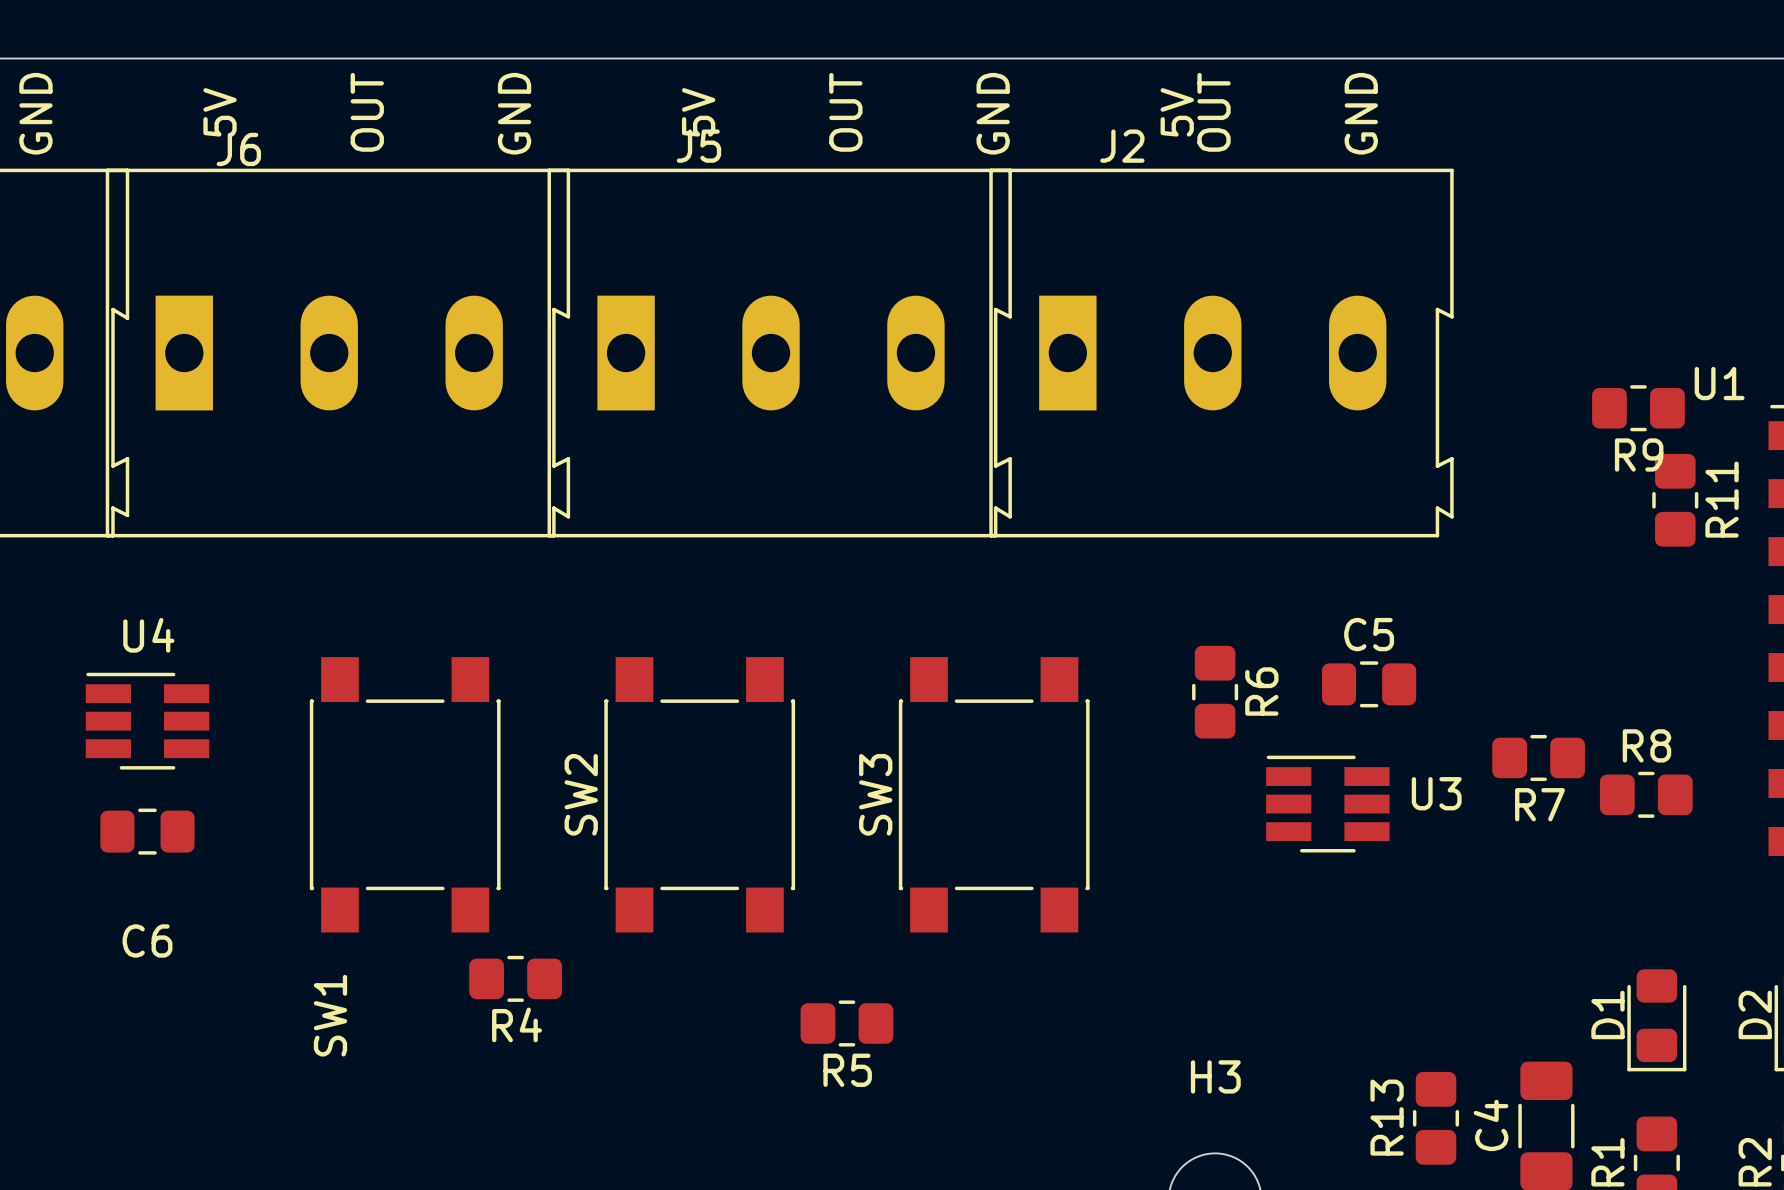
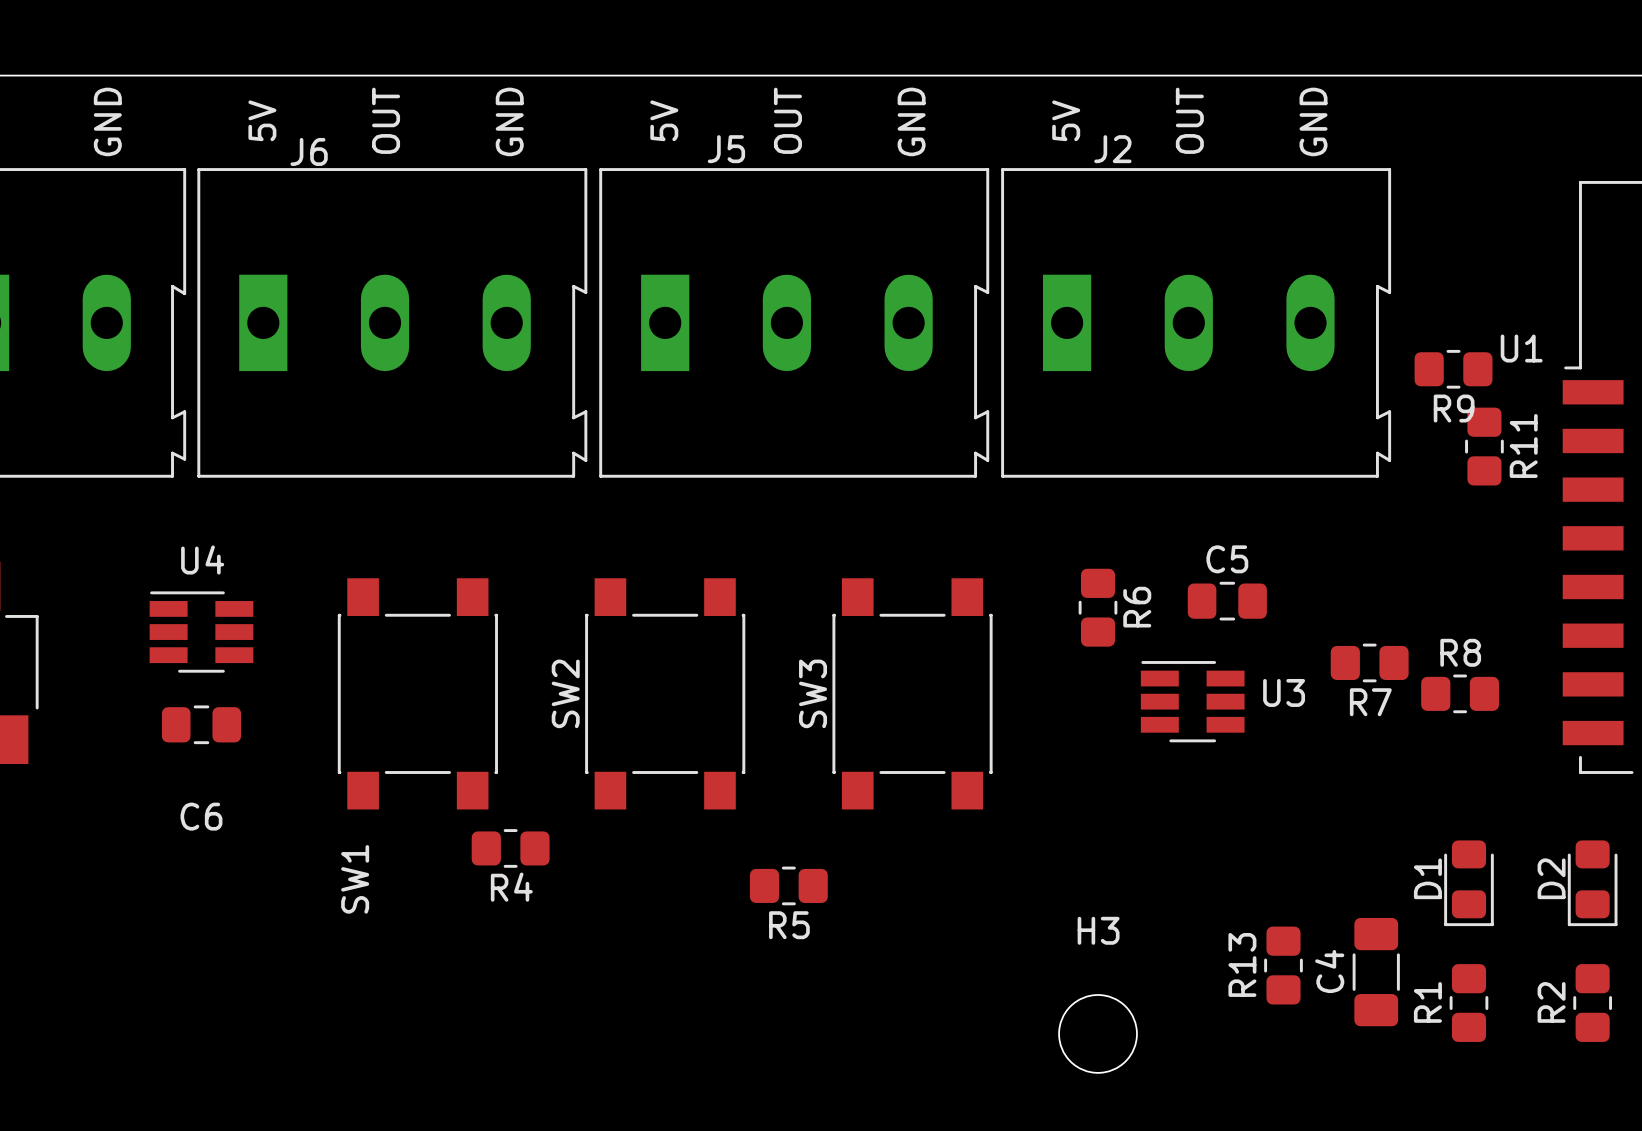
text position: OUT (1214, 112) -> OUT (1189, 120)
text position: GND (1361, 113) -> GND (1313, 121)
J6 position: (337, 353) -> (392, 322)
J5 position: (779, 353) -> (794, 322)
J2 position: (1221, 353) -> (1196, 322)

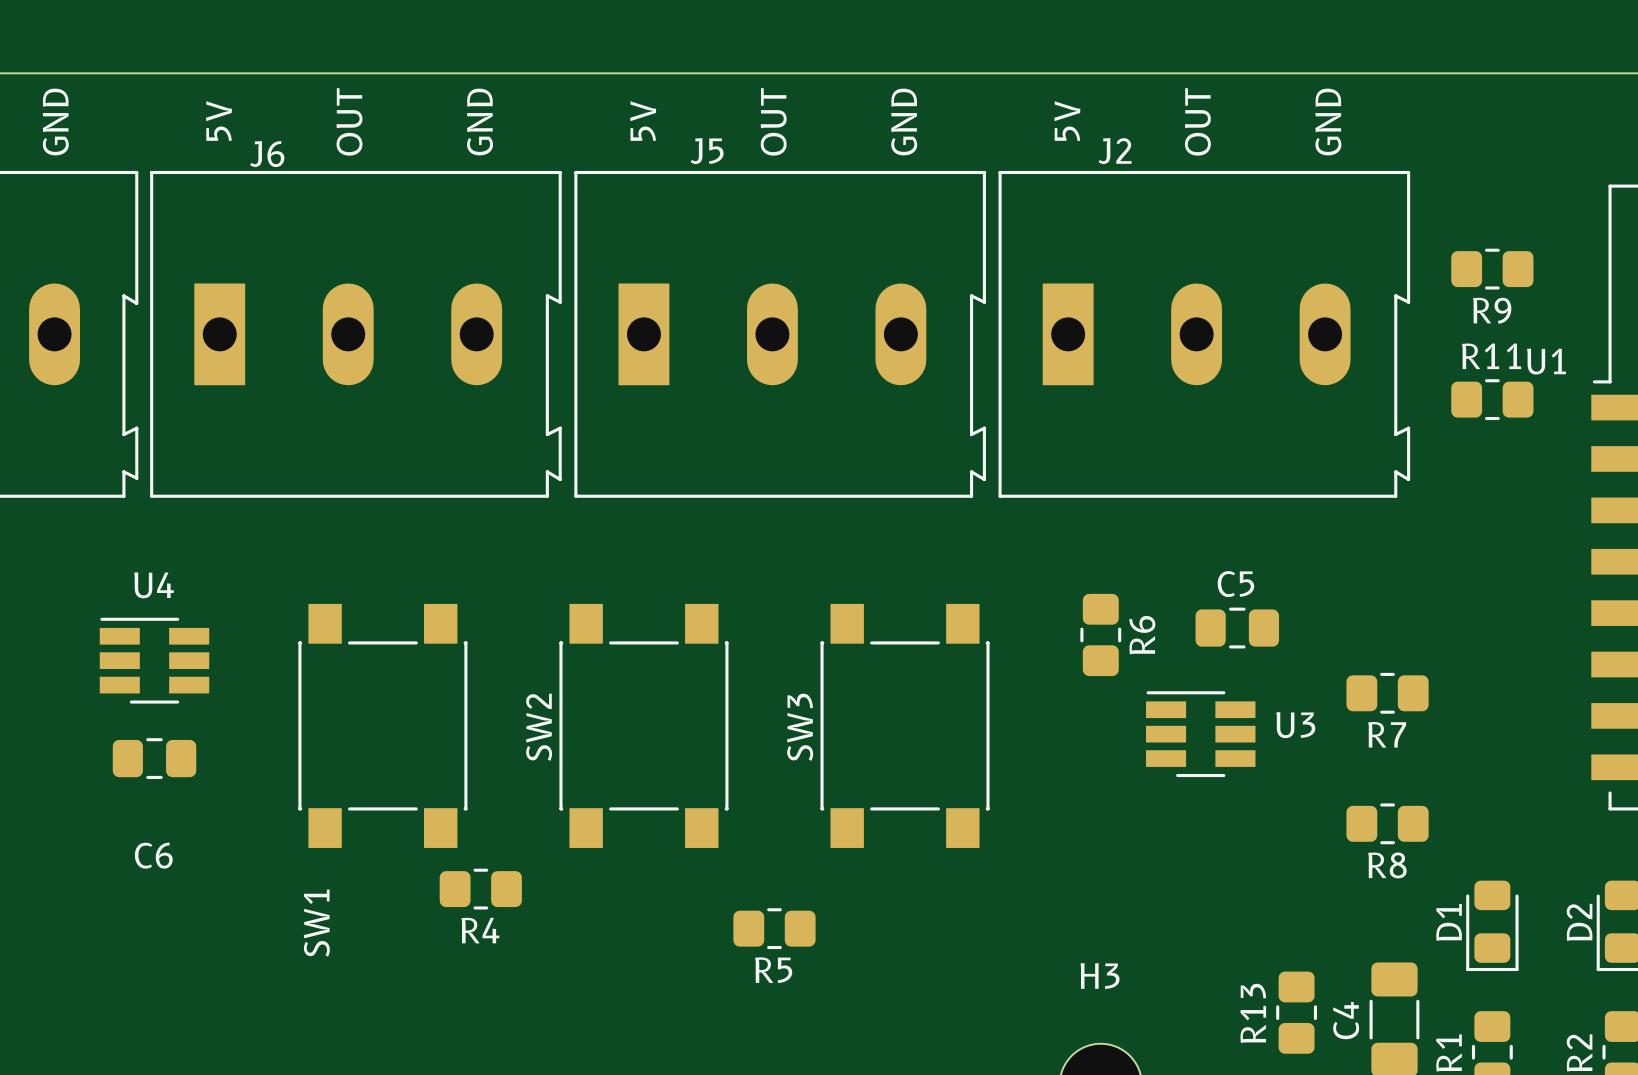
R9 position: (1453, 369) -> (1492, 269)
R11 name position: R11 (1523, 445) -> R11 (1491, 356)
R11 rotation: 0° (1484, 446) -> 90° clockwise (1492, 399)
R11 position: (1484, 446) -> (1492, 399)
R8 name position: R8 (1460, 652) -> R8 (1387, 865)
R8 position: (1460, 693) -> (1387, 823)

